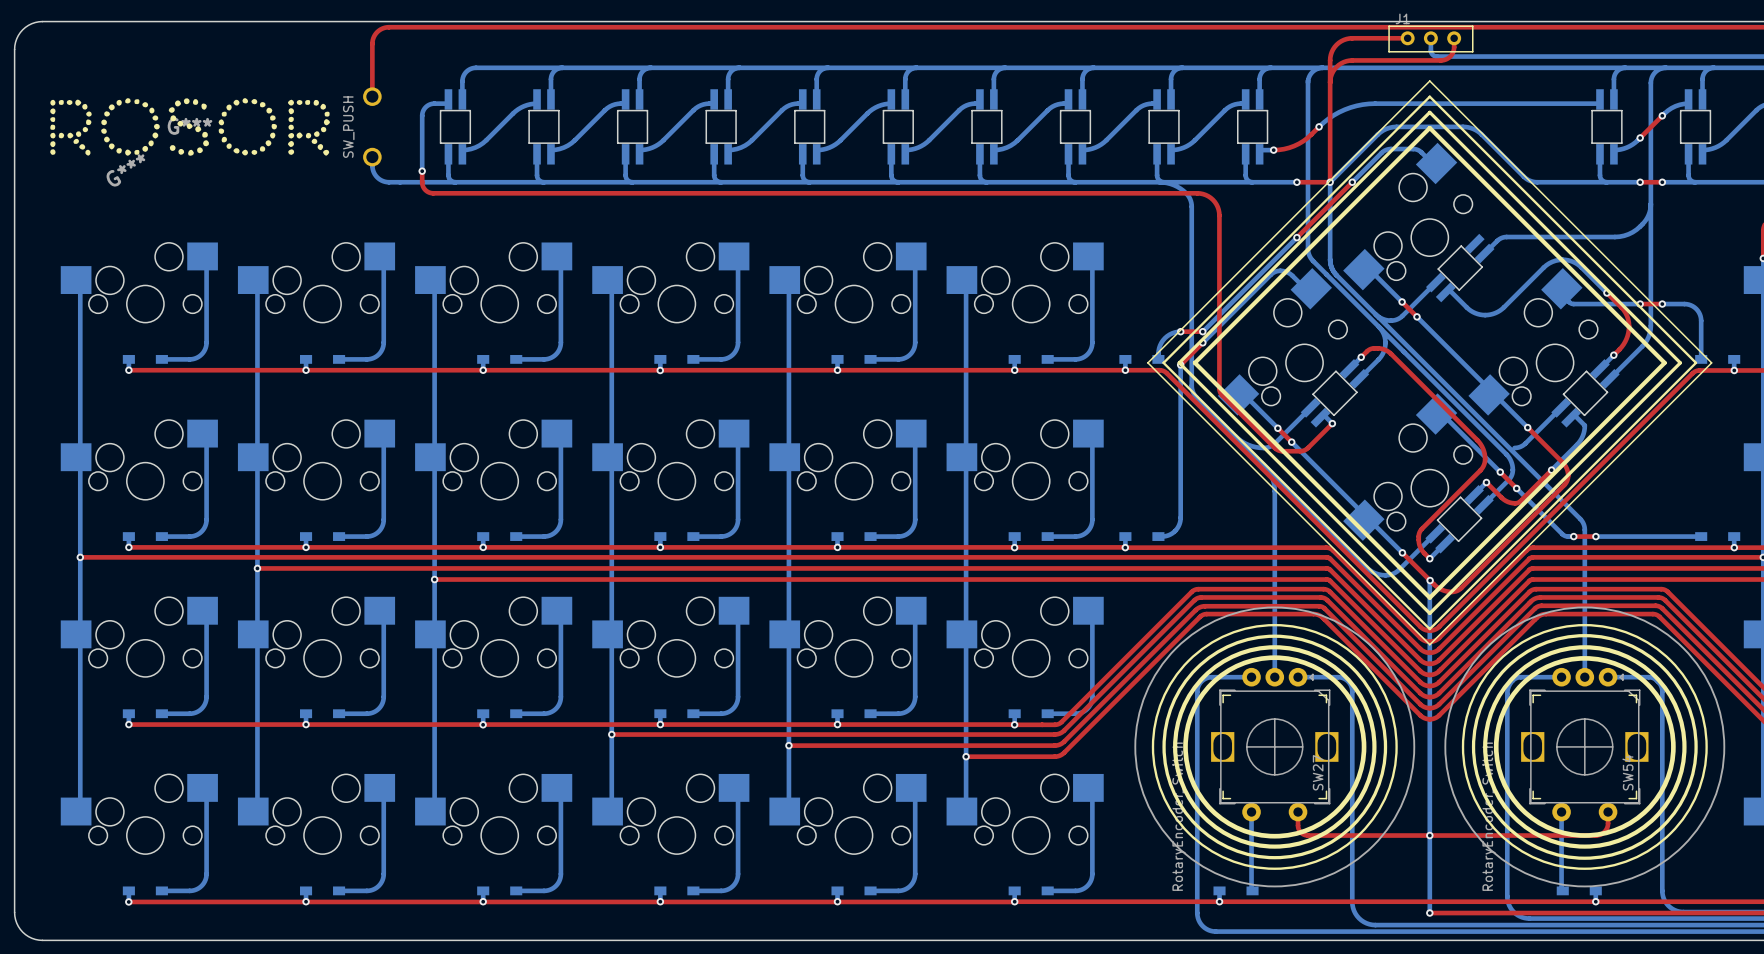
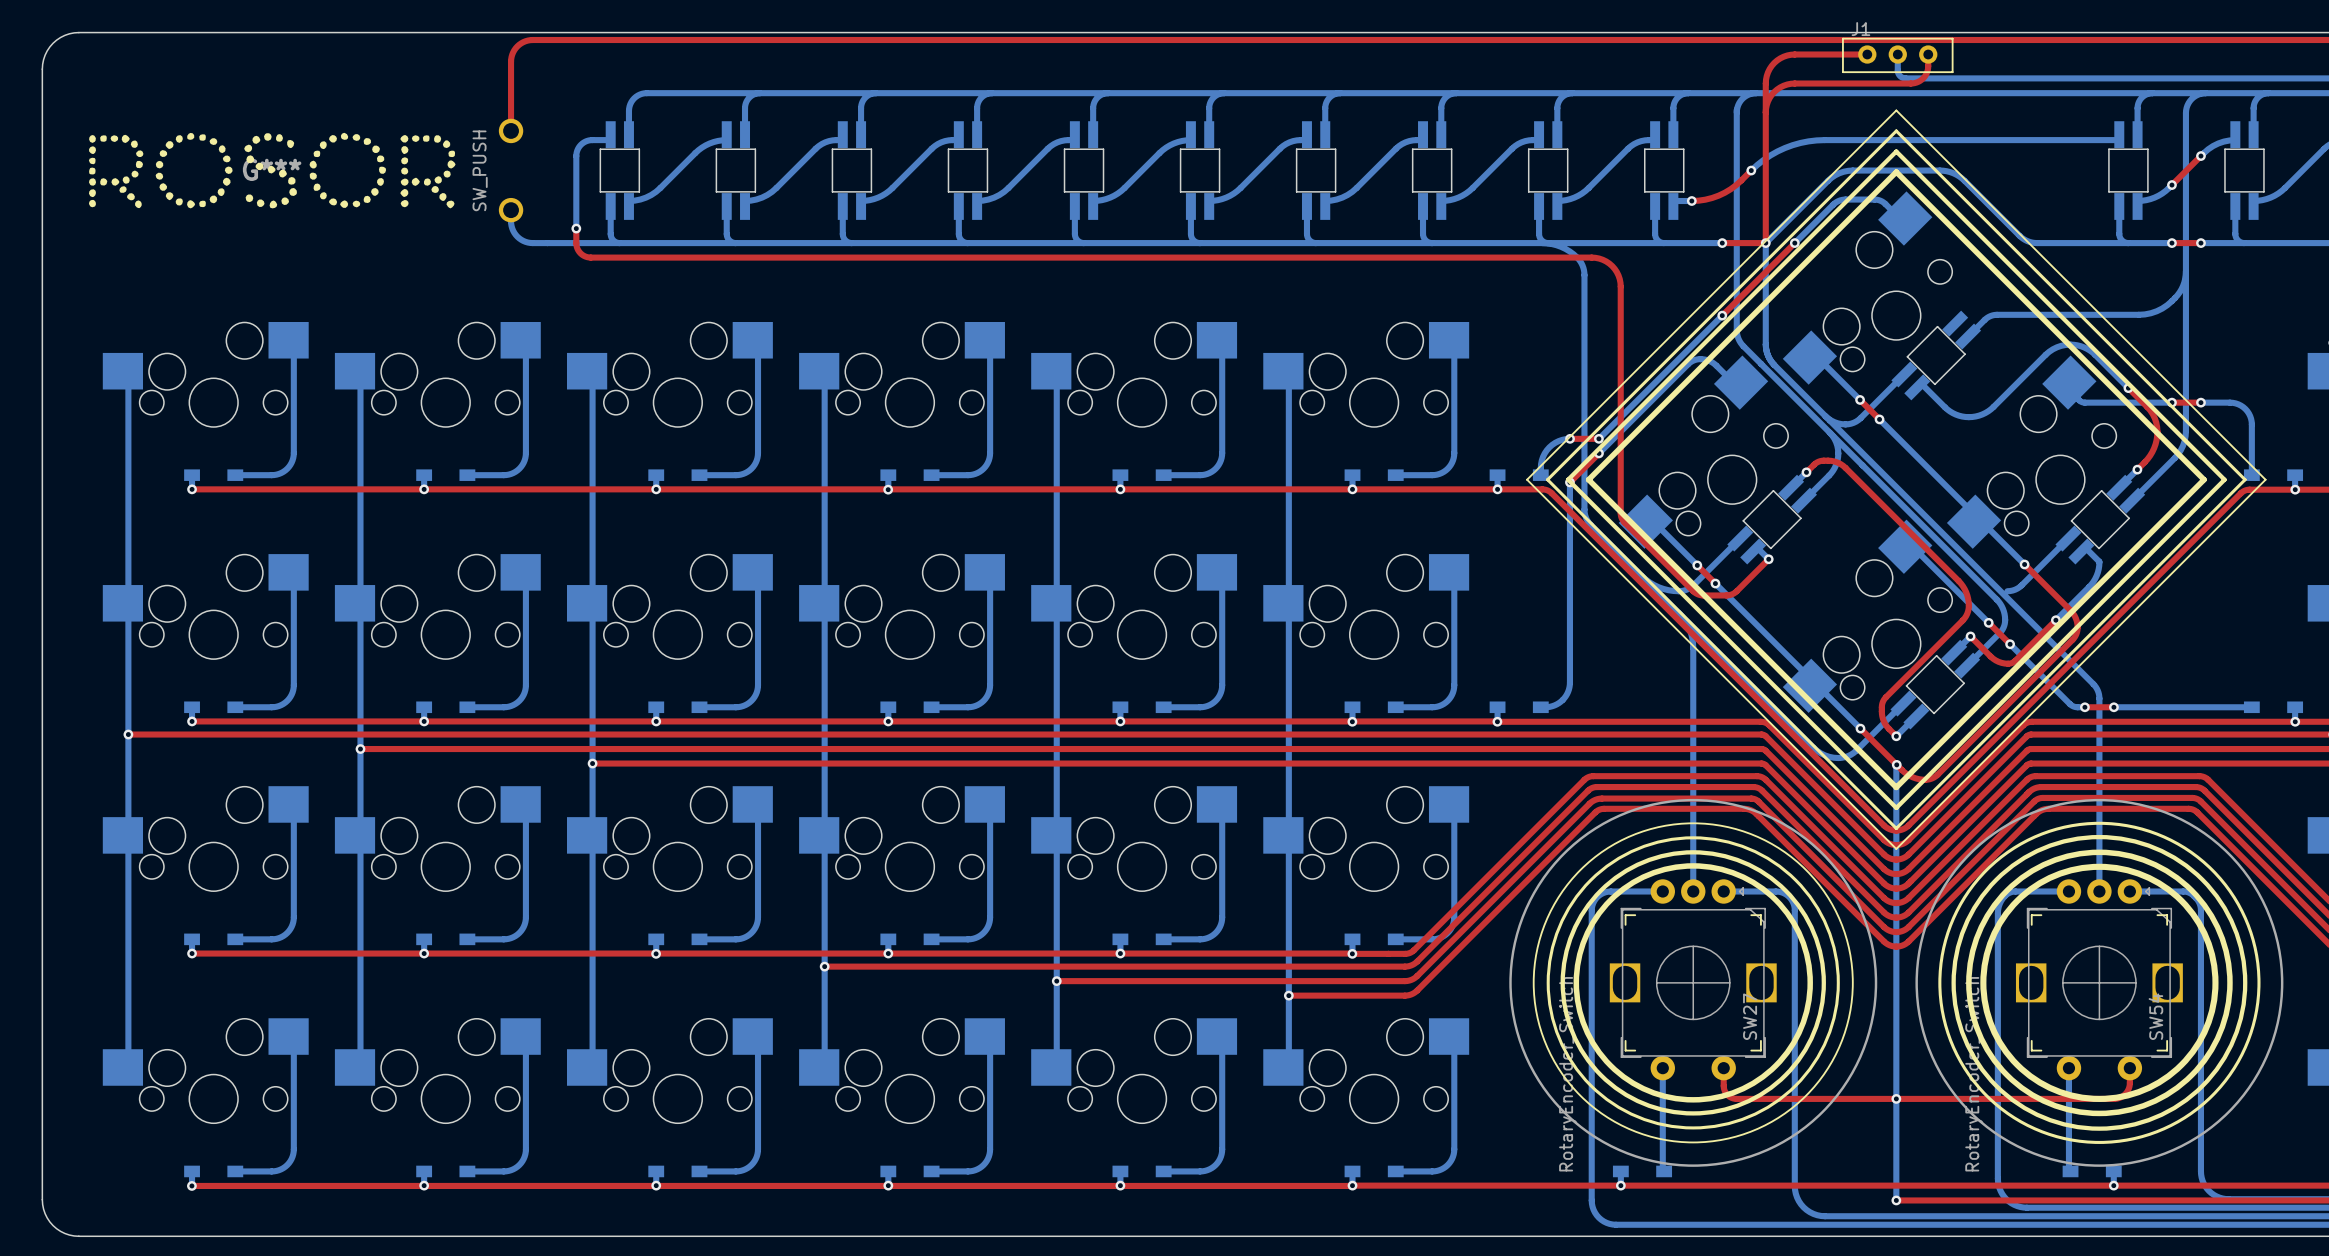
G***: (125, 170) -> none
drawing: [1151, 623, 1398, 870] -> none
drawing: none -> [1532, 822, 1854, 1144]

